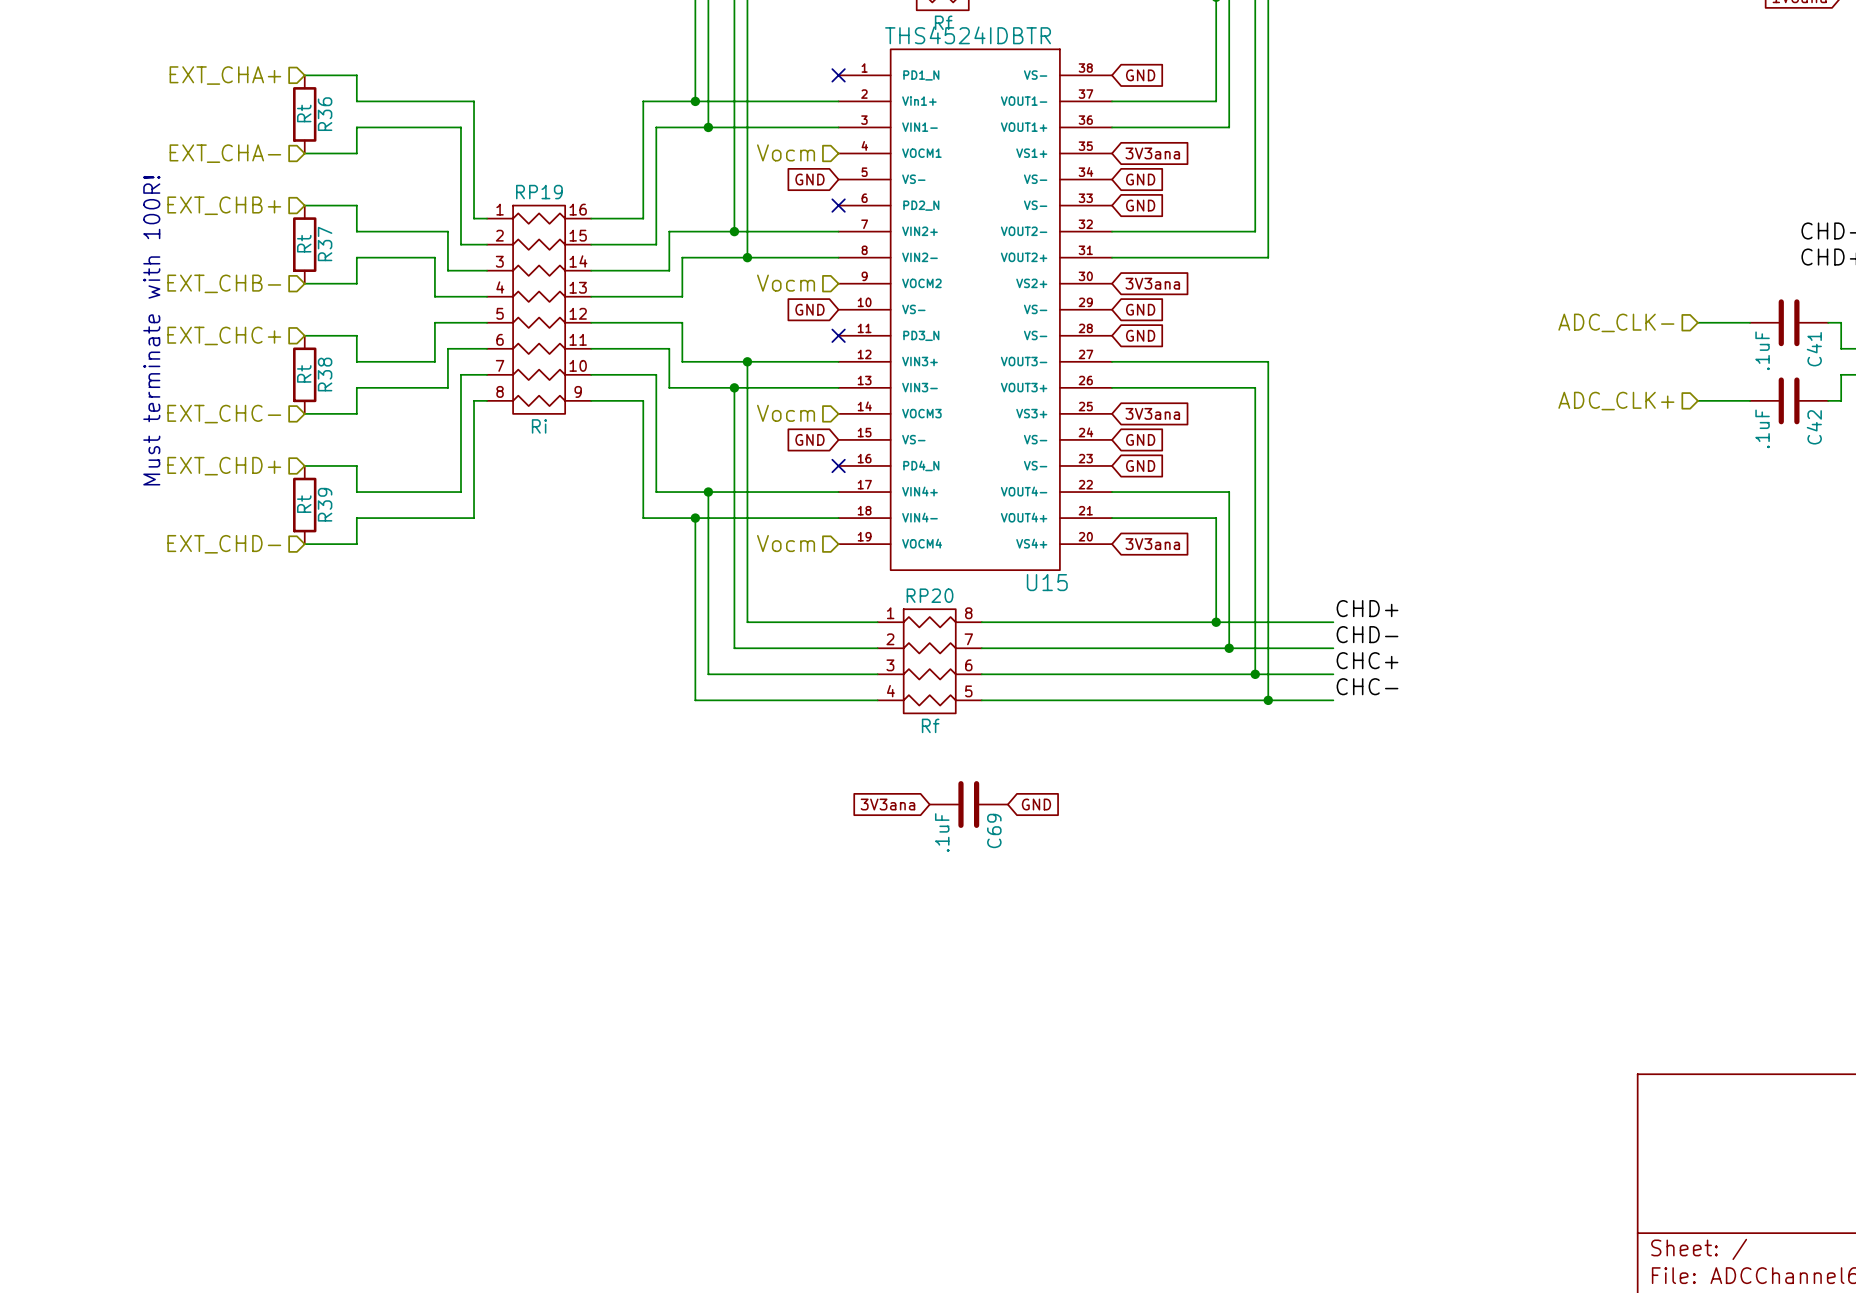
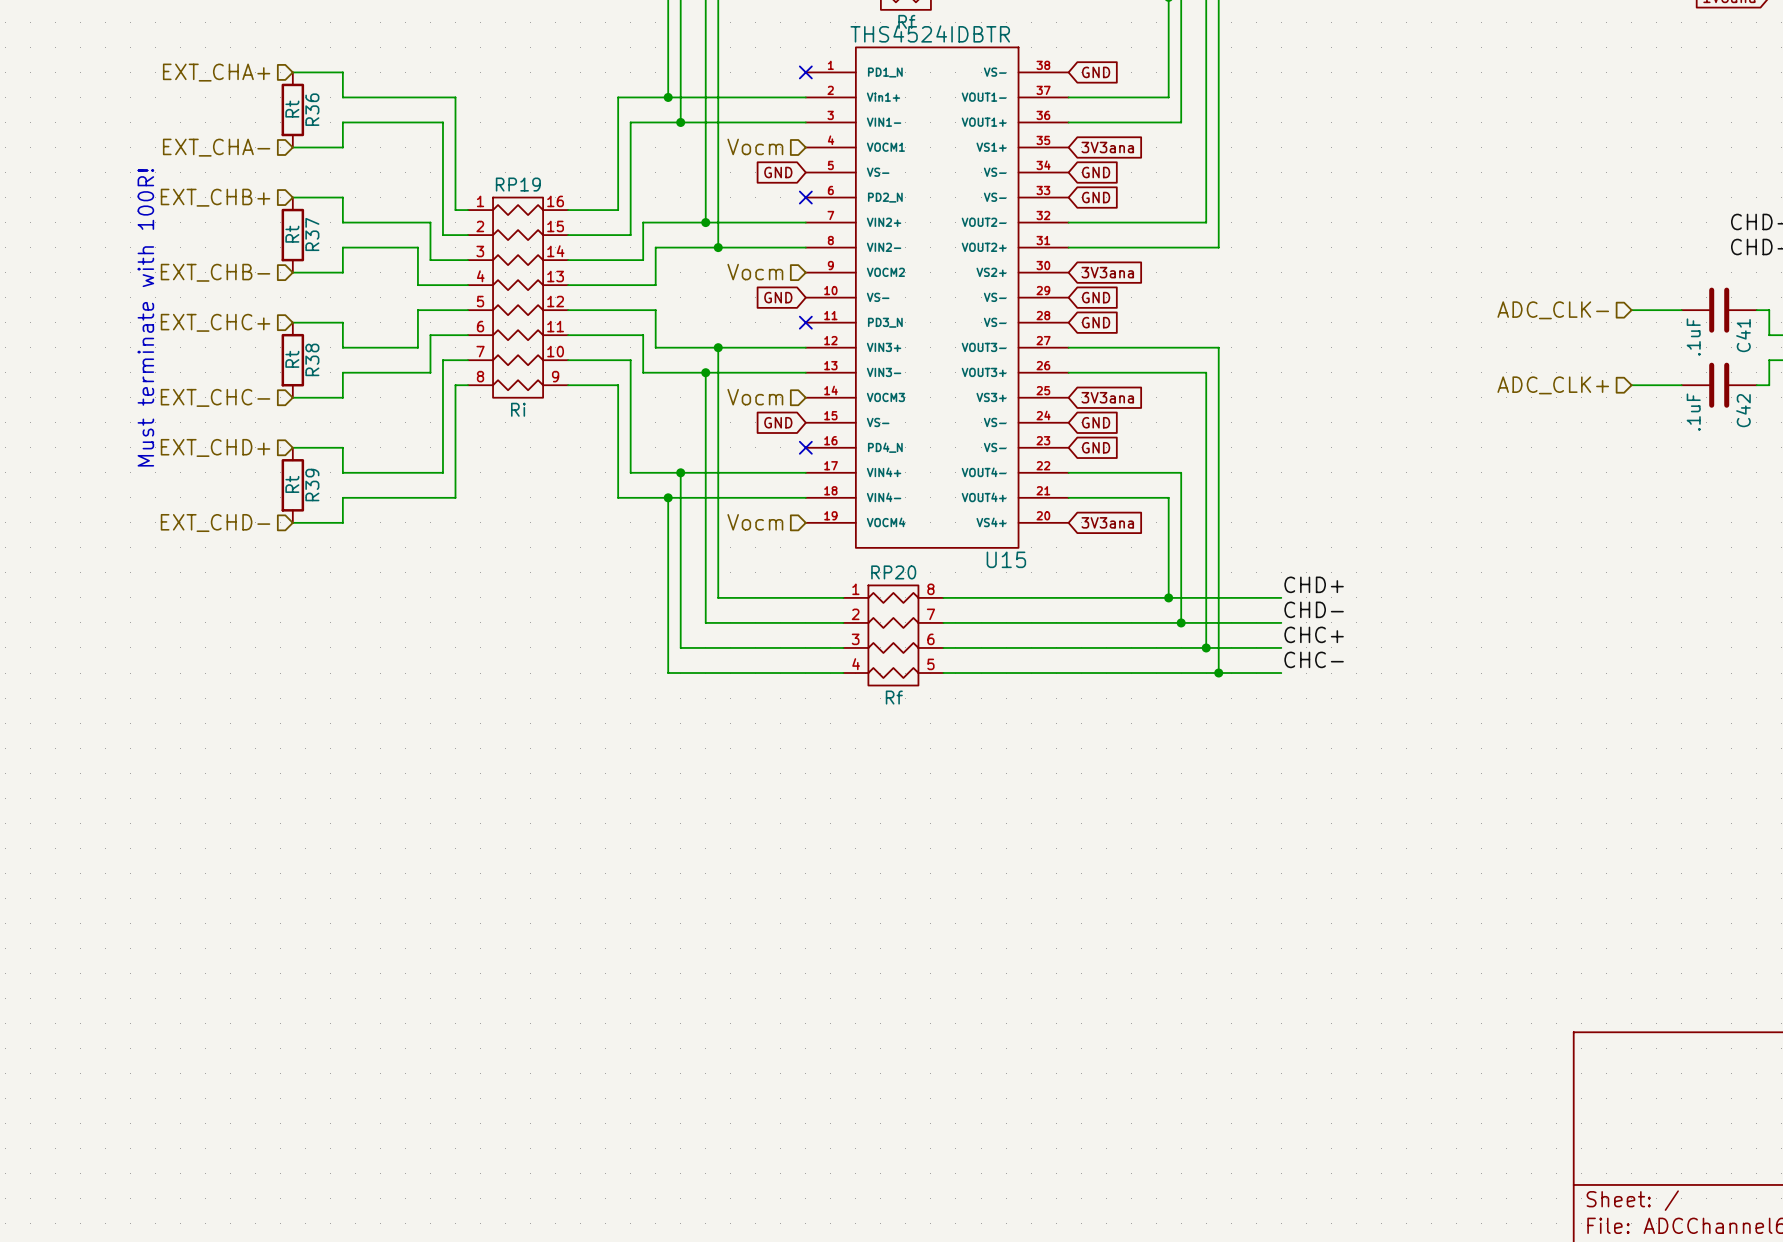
global label: 3V3ana (887, 804) -> none
C69: .1uF (968, 804) -> none
global label: GND (1036, 804) -> none

